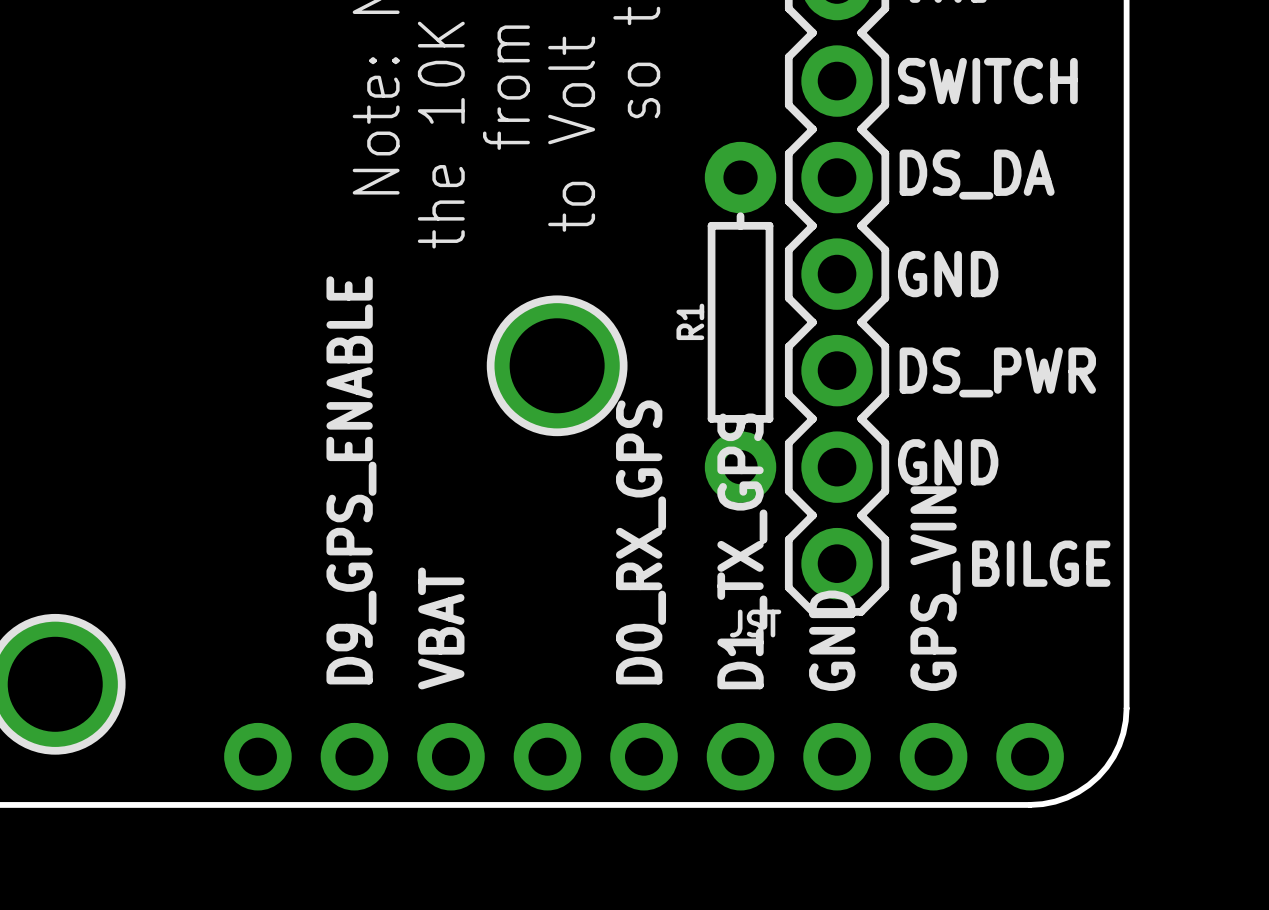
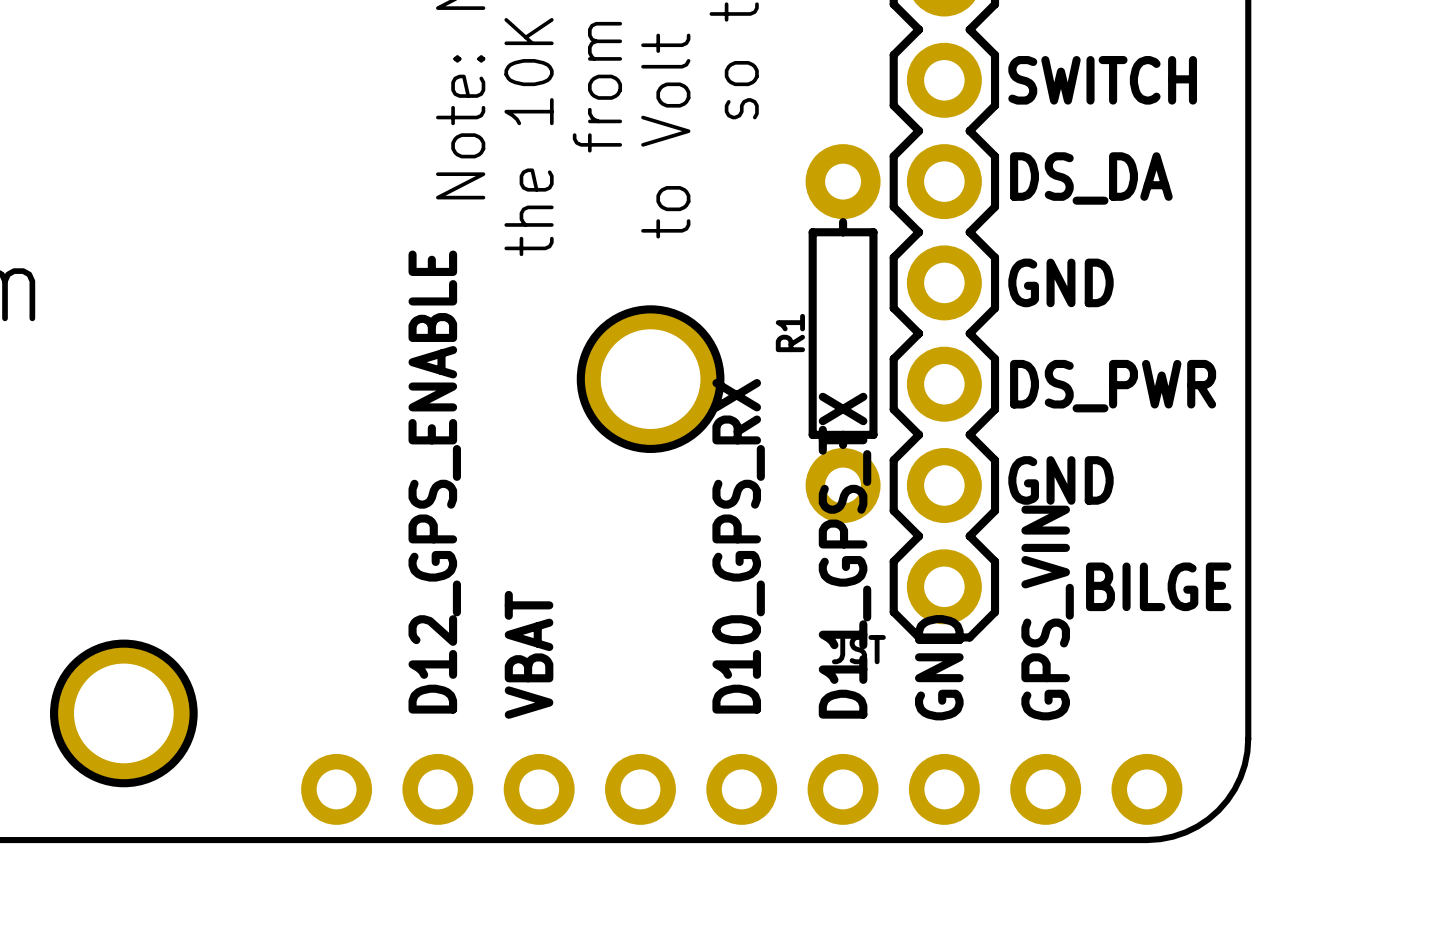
text: D9_GPS_ENABLE (351, 480) -> D12_GPS_ENABLE (434, 482)
text: D0_RX_GPS (641, 542) -> D10_GPS_RX (738, 546)
text: D1_TX_GPS (742, 551) -> D11_GPS_TX (845, 555)

